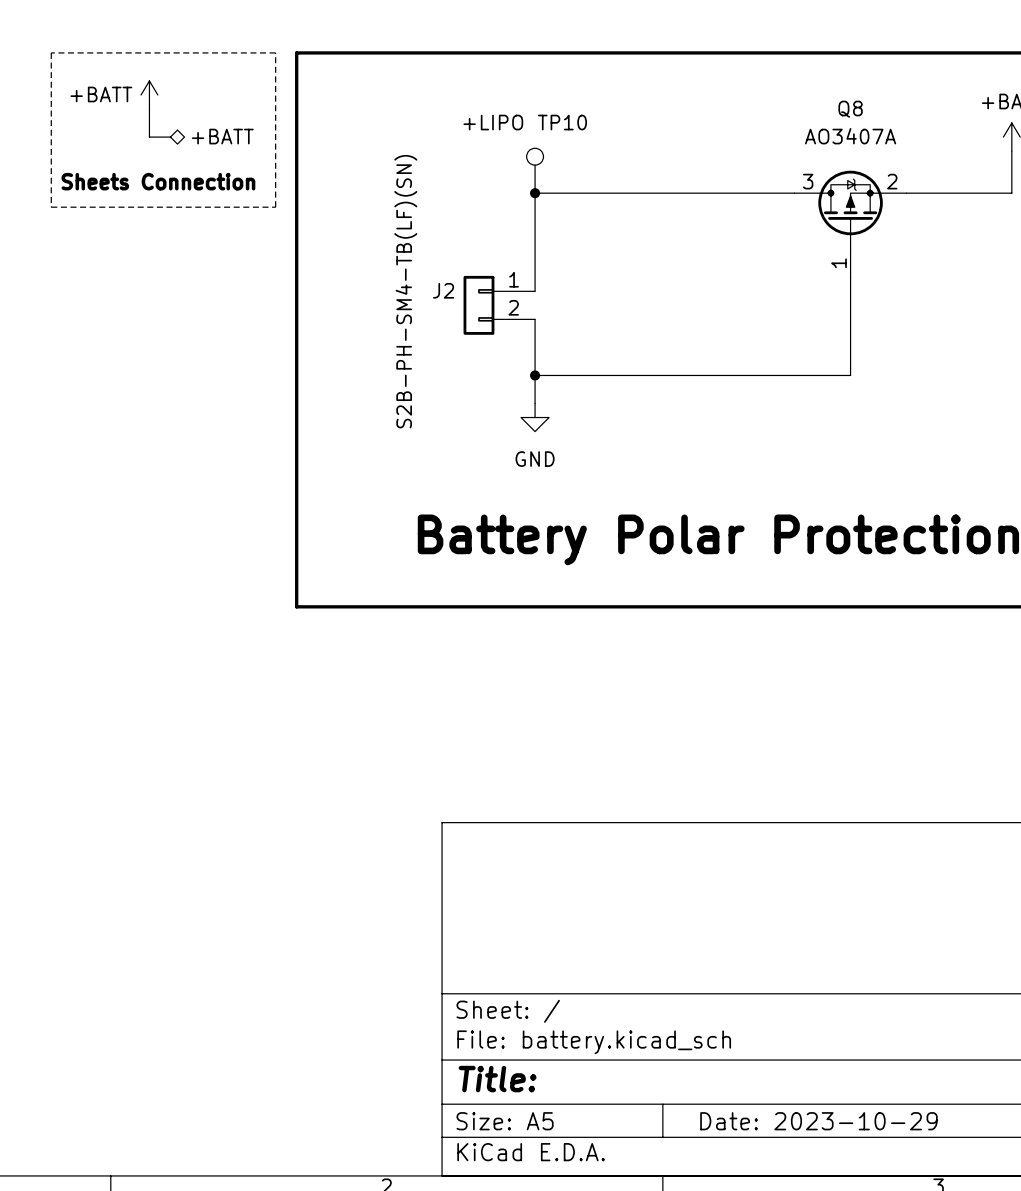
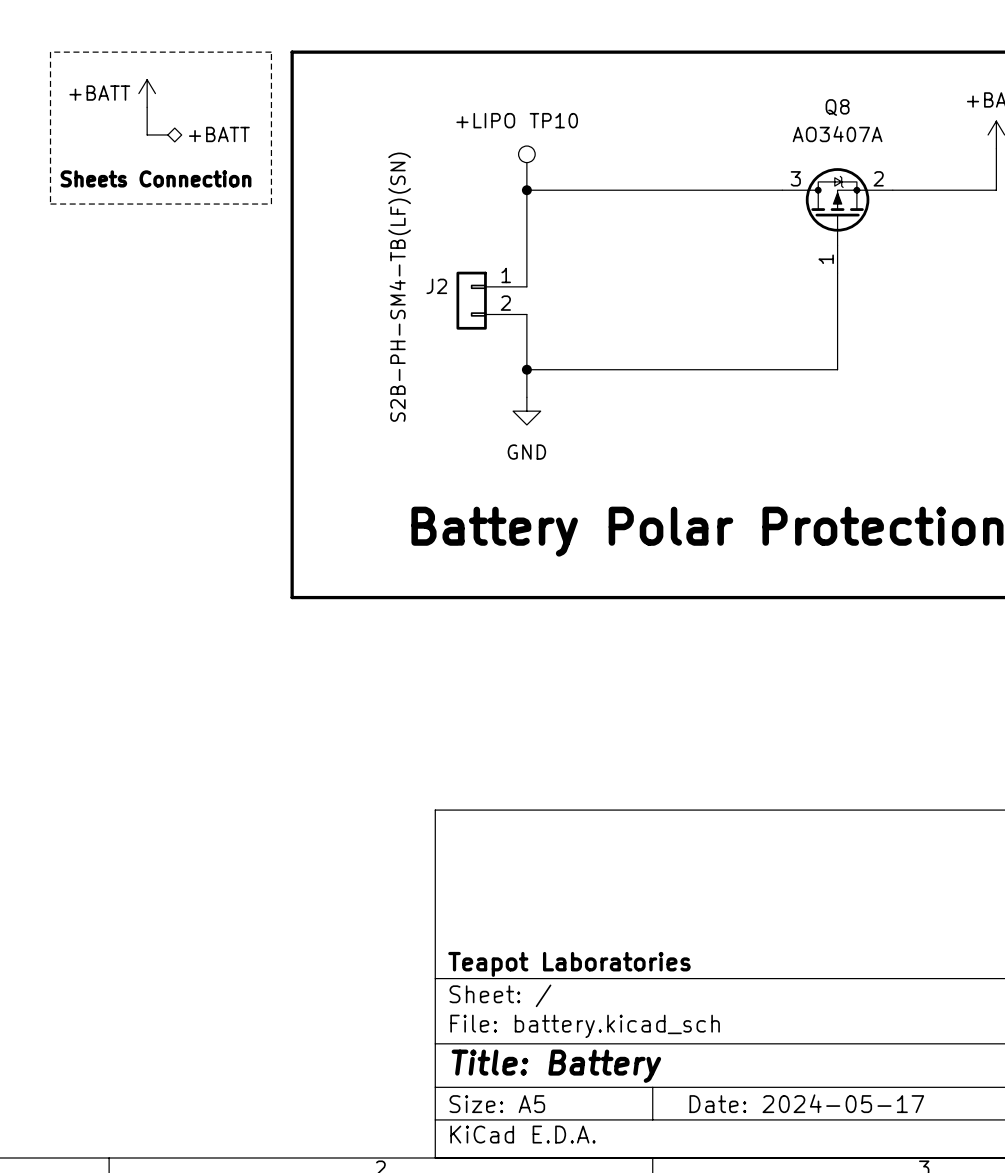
title block: none -> Teapot Laboratories (569, 964)
title block: Title: (497, 1079) -> Title: Battery (556, 1066)
title block: Date: 2023-10-29 (818, 1121) -> Date: 2024-05-17 (806, 1103)

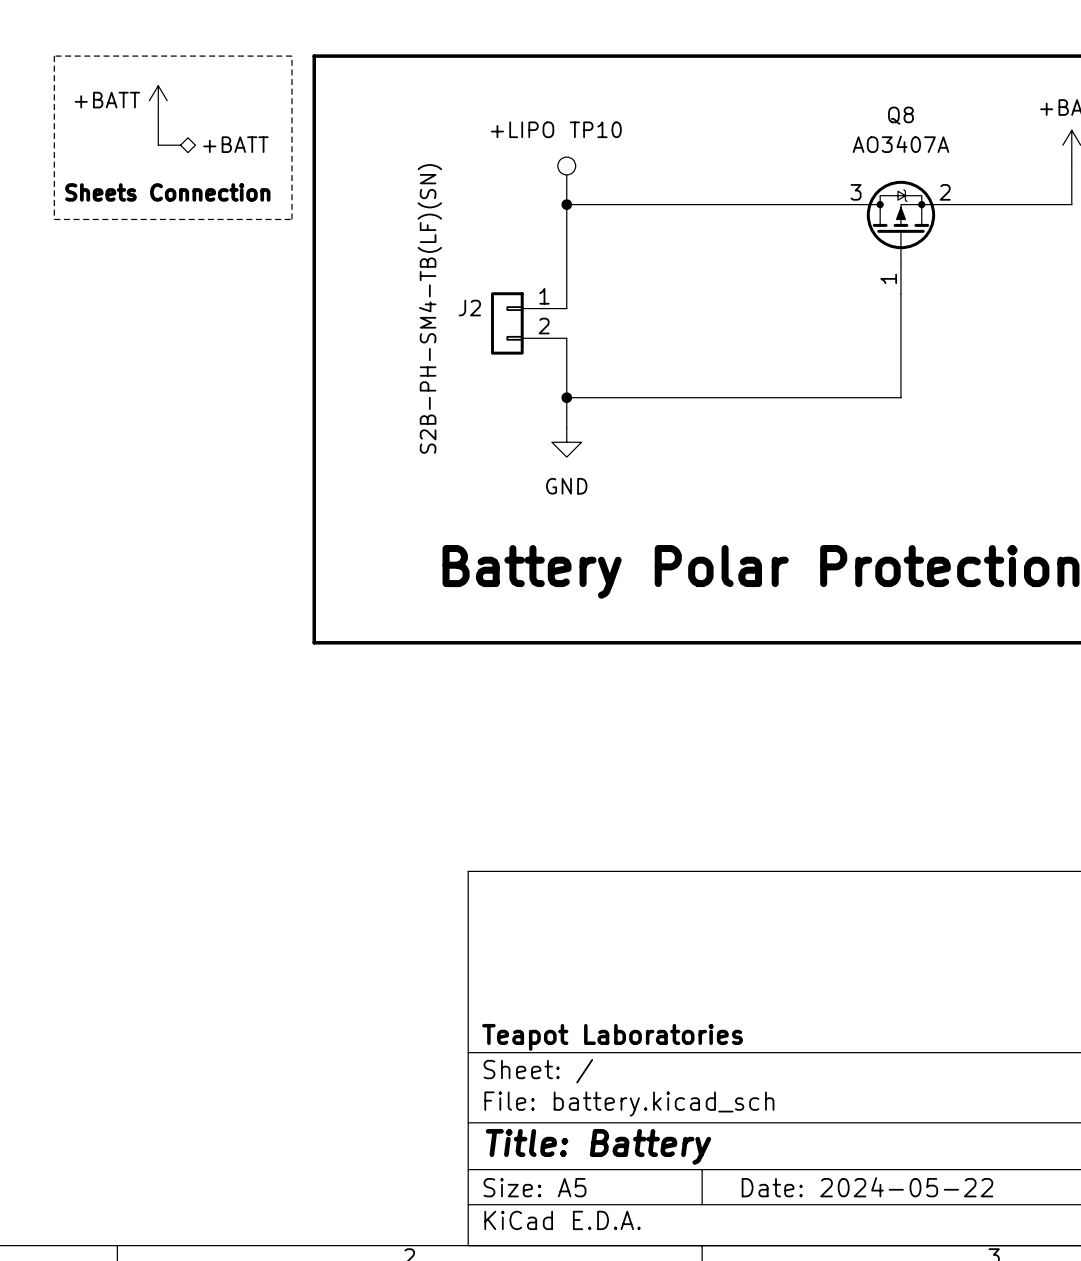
title block: Date: 2024-05-17 (806, 1103) -> Date: 2024-05-22 (867, 1187)

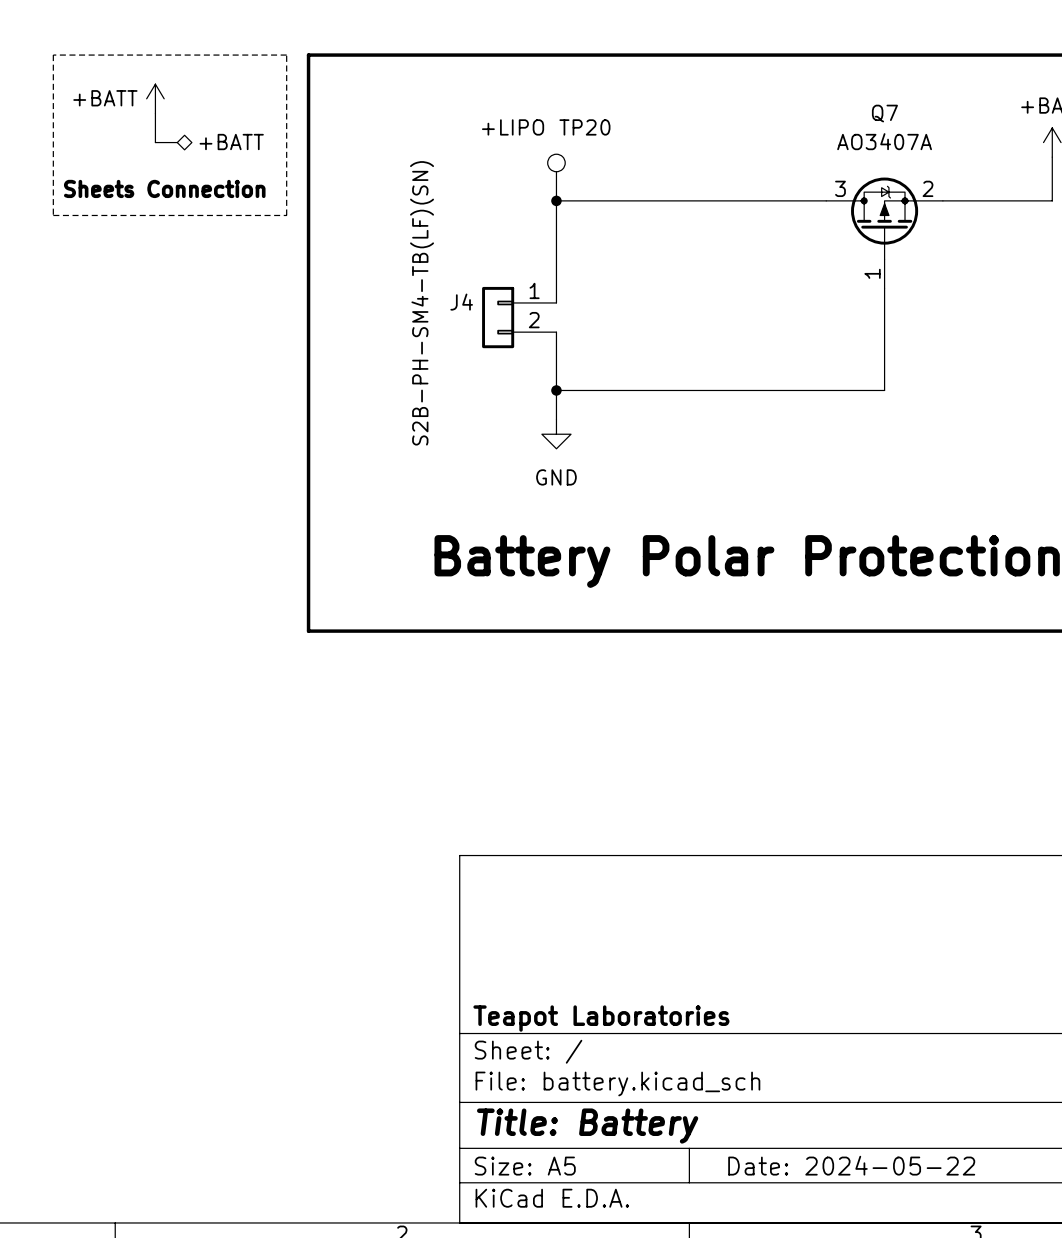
Q8 name: Q8 (900, 115) -> Q7 (884, 113)
TP10 name: TP10 (595, 129) -> TP20 (584, 127)
J2 name: J2 (469, 308) -> J4 (461, 302)

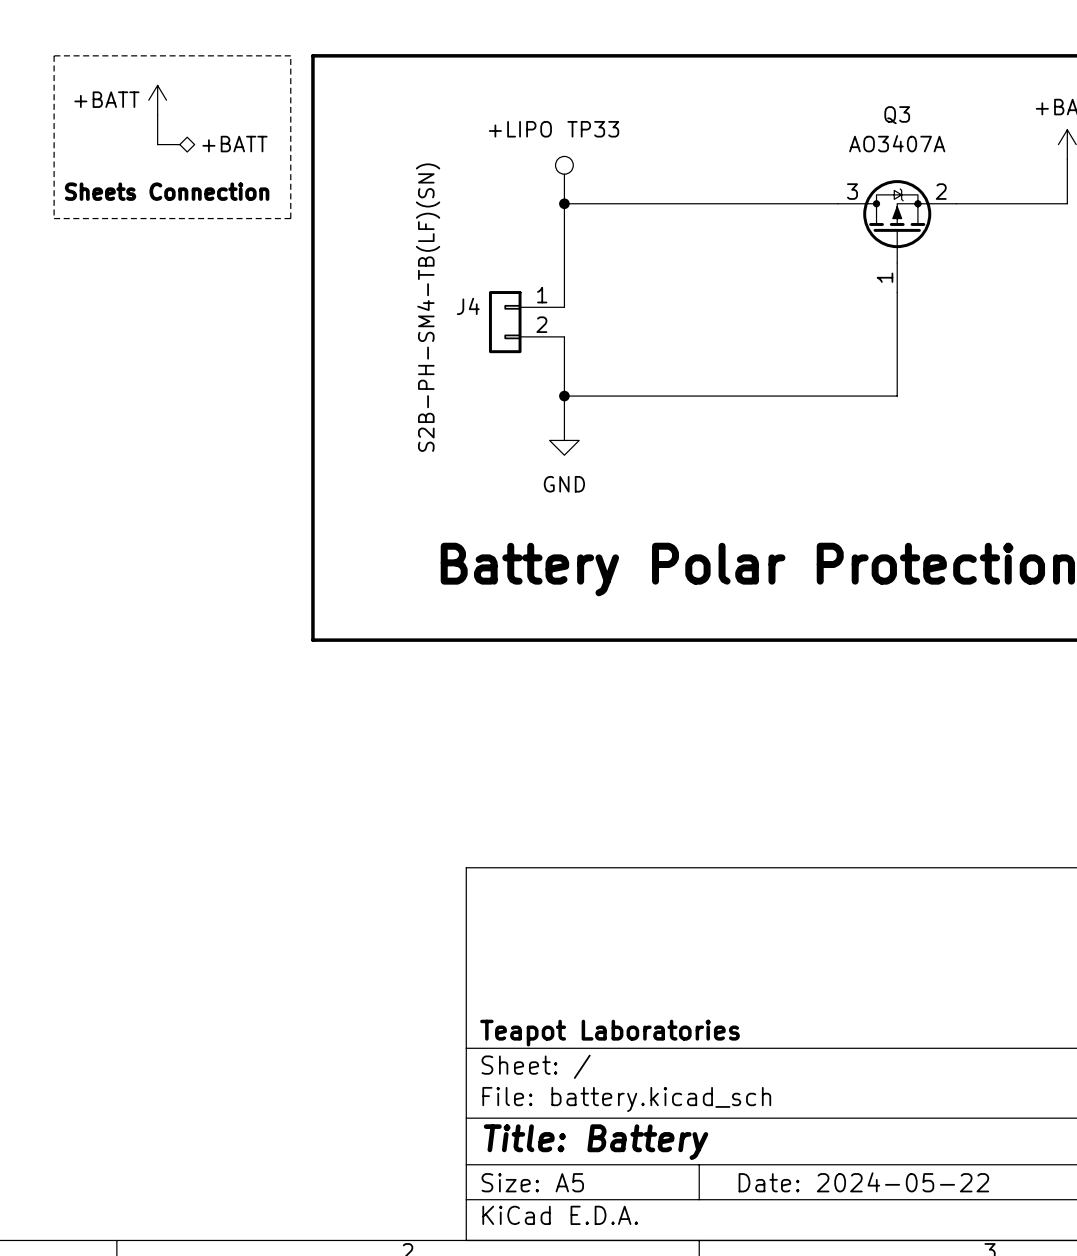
Q7 name: Q7 (884, 113) -> Q3 (897, 115)
TP20 name: TP20 (584, 127) -> TP33 (593, 129)

